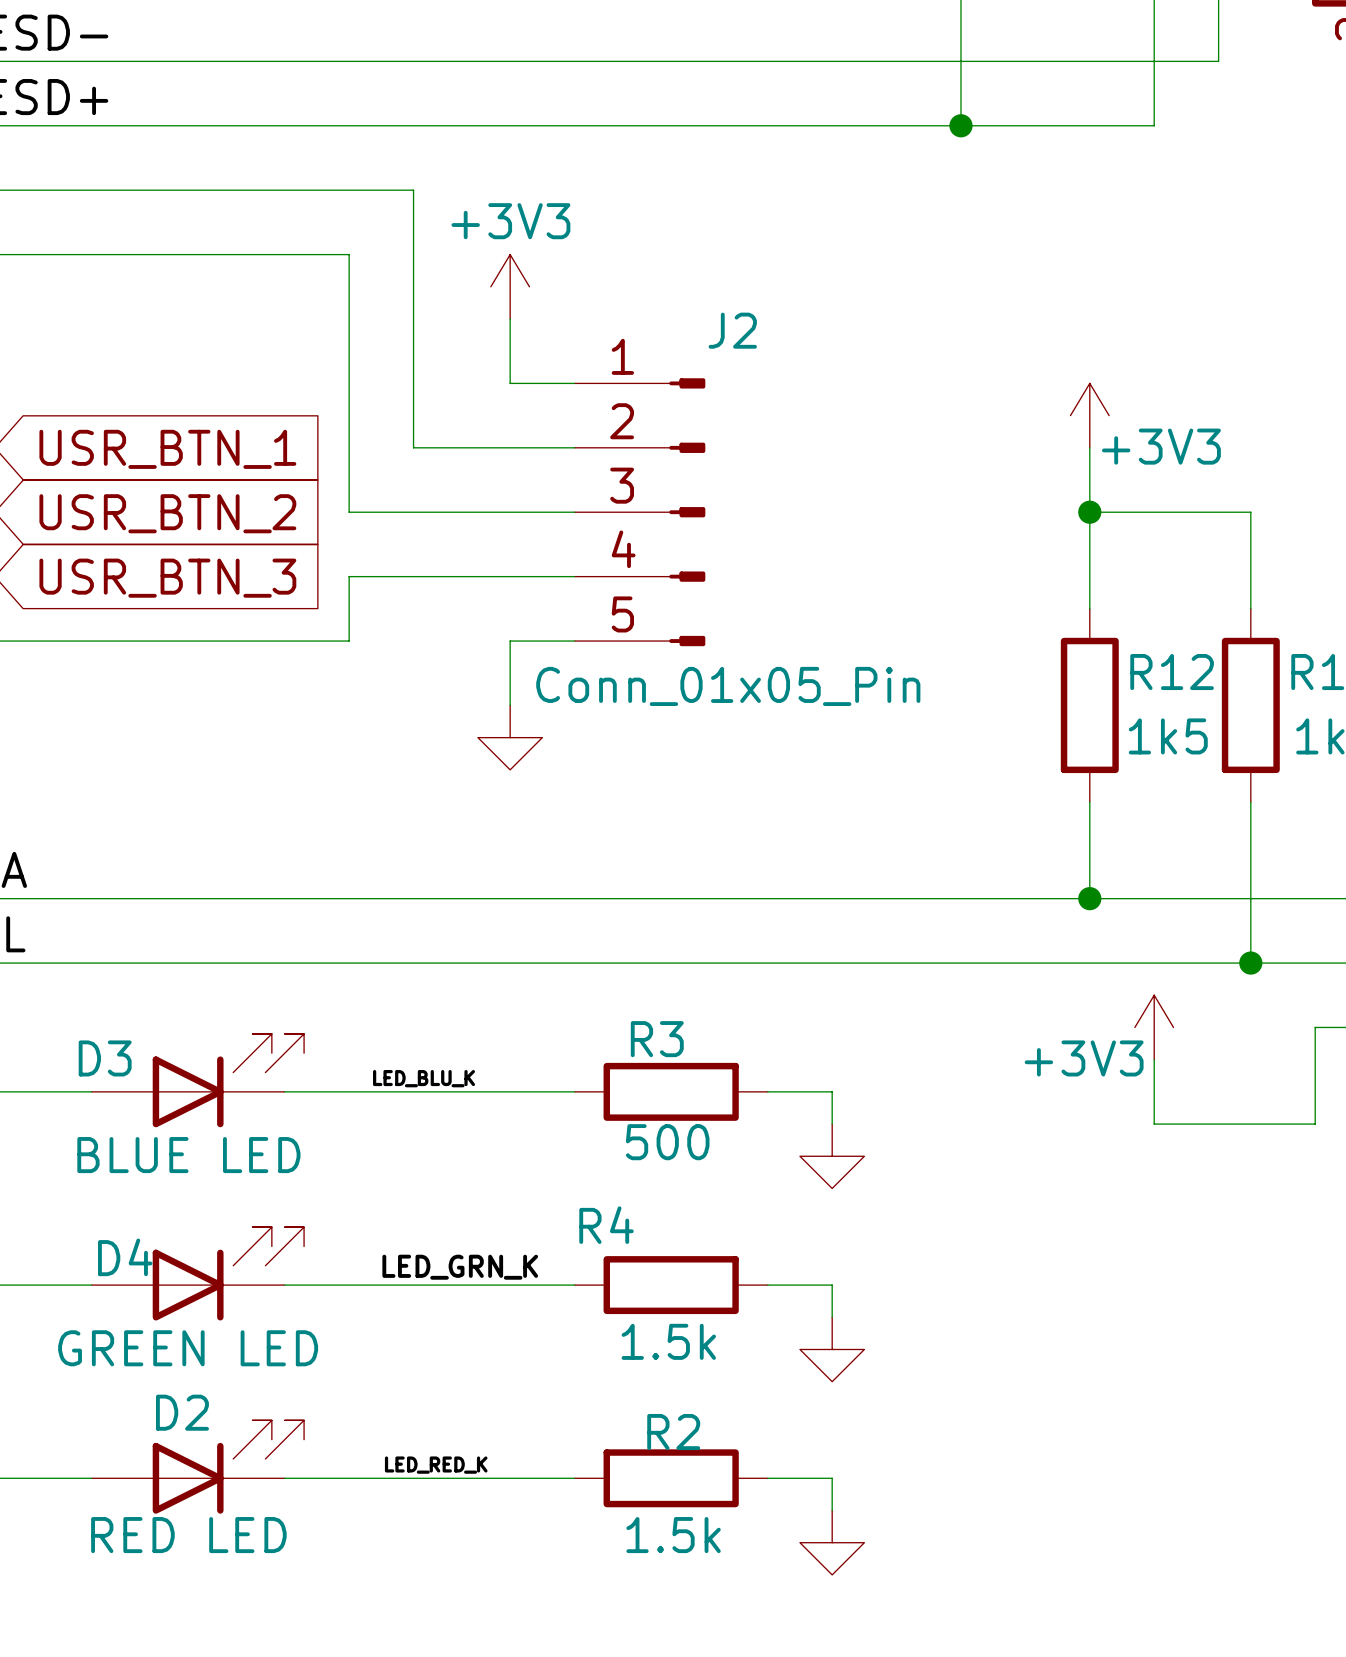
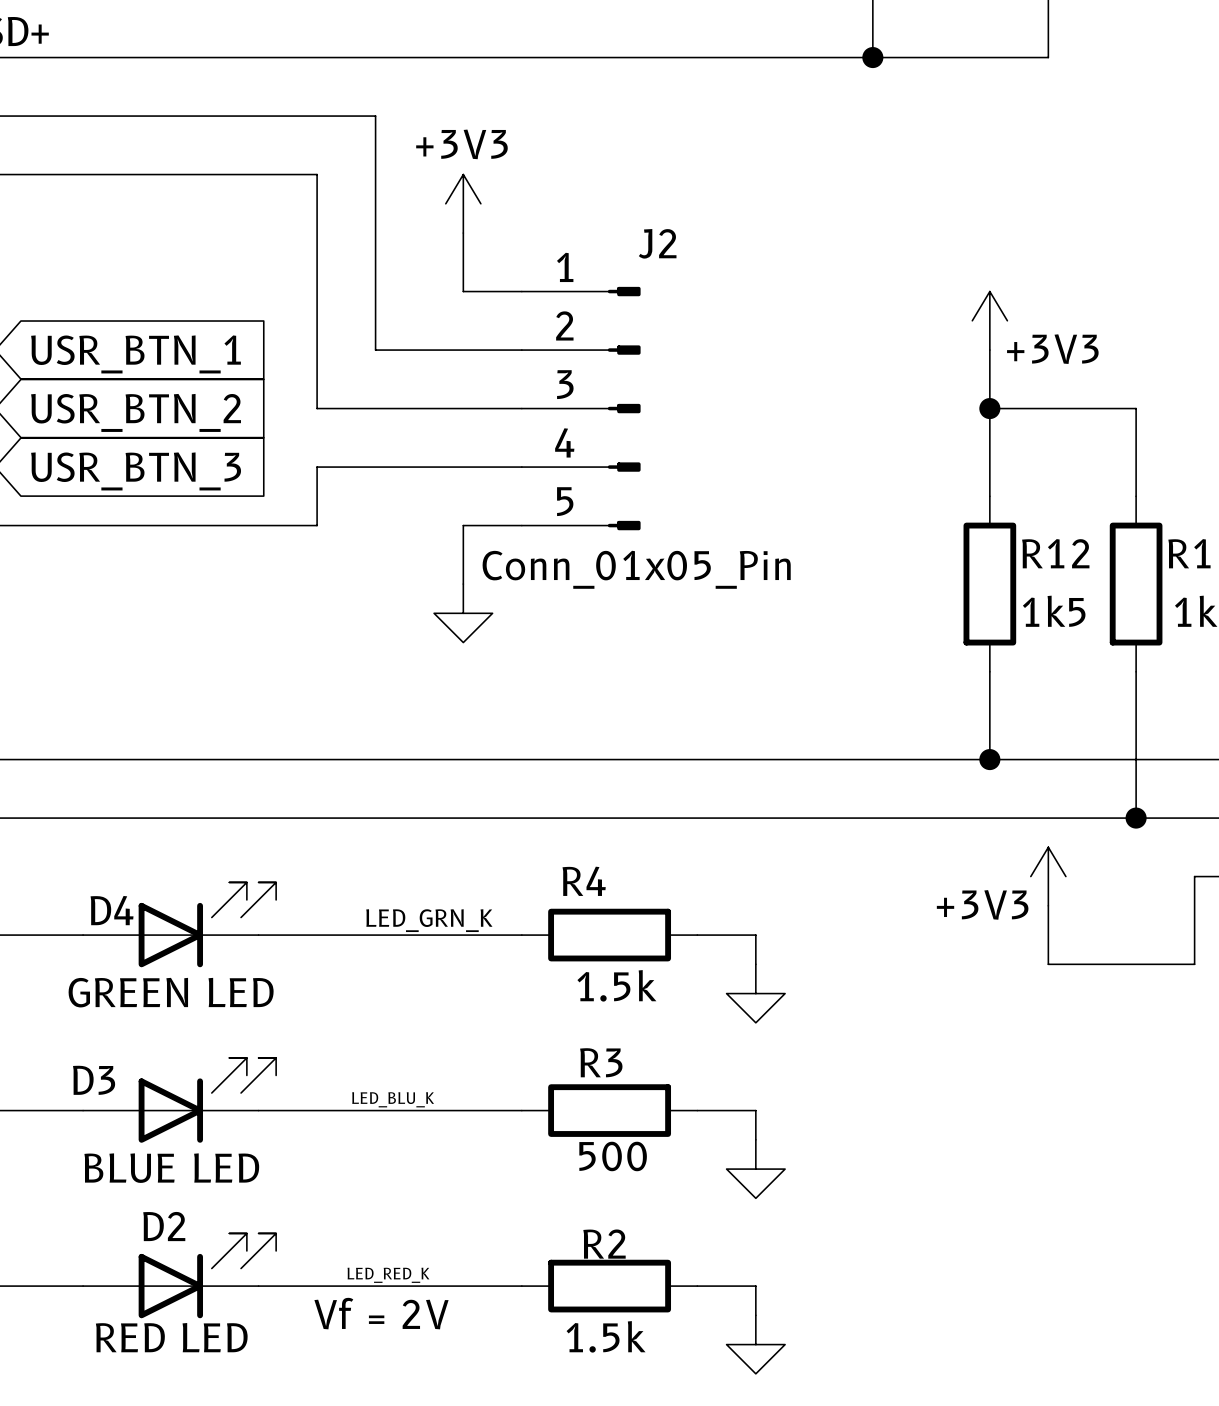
R3 name: R3 (657, 1039) -> R4 (584, 881)
D3 name: D3 (105, 1058) -> D4 (112, 910)
label position: LED_BLU_K (424, 1078) -> LED_BLU_K (393, 1099)
R3 value: 500 (667, 1142) -> 1.5k (616, 985)
D3 value: BLUE LED (188, 1155) -> GREEN LED (171, 992)
R4 name: R4 (606, 1225) -> R3 (601, 1062)
D4 name: D4 (125, 1257) -> D3 (94, 1080)
label position: LED_GRN_K (460, 1267) -> LED_GRN_K (429, 920)
R4 value: 1.5k (668, 1341) -> 500 (613, 1156)
D4 value: GREEN LED (188, 1348) -> BLUE LED (171, 1168)
text: none -> Vf = 2V (381, 1313)

